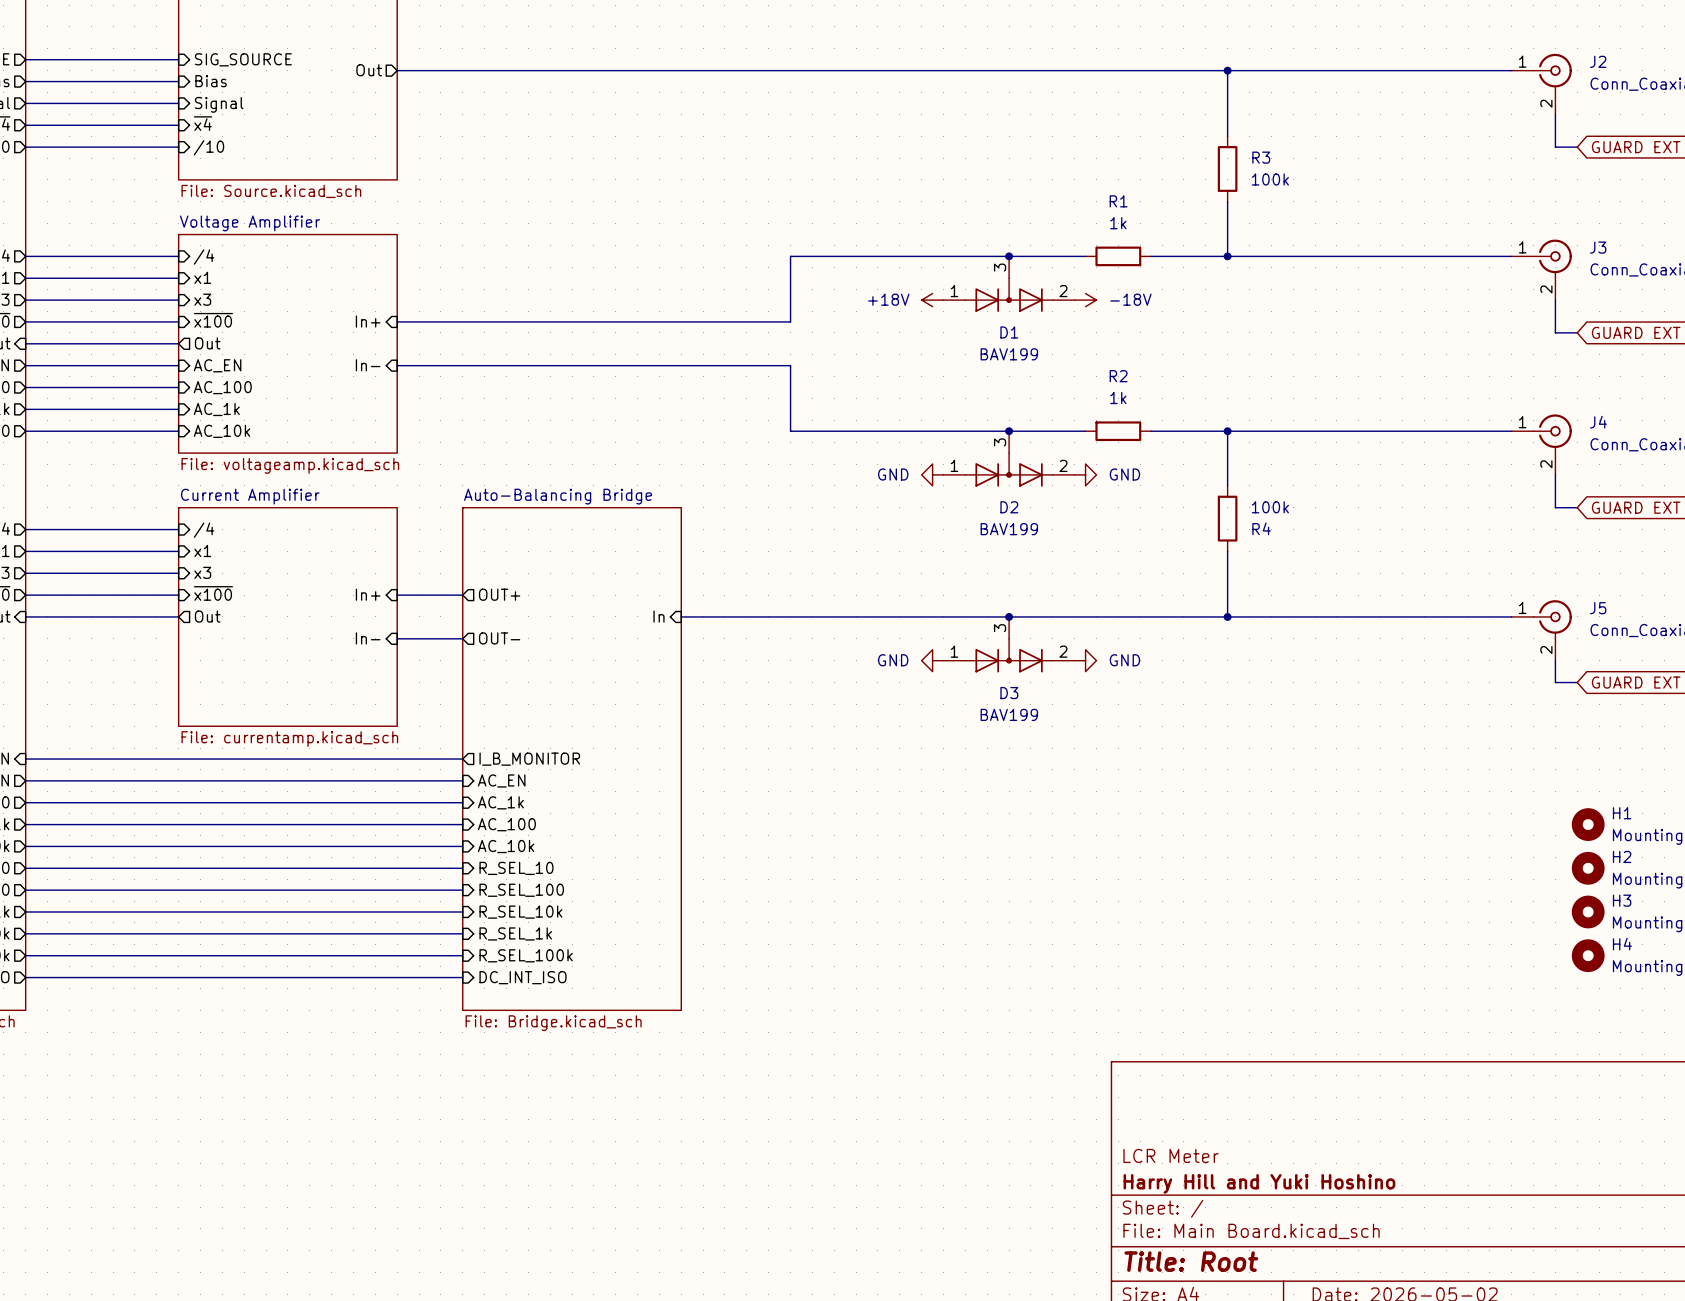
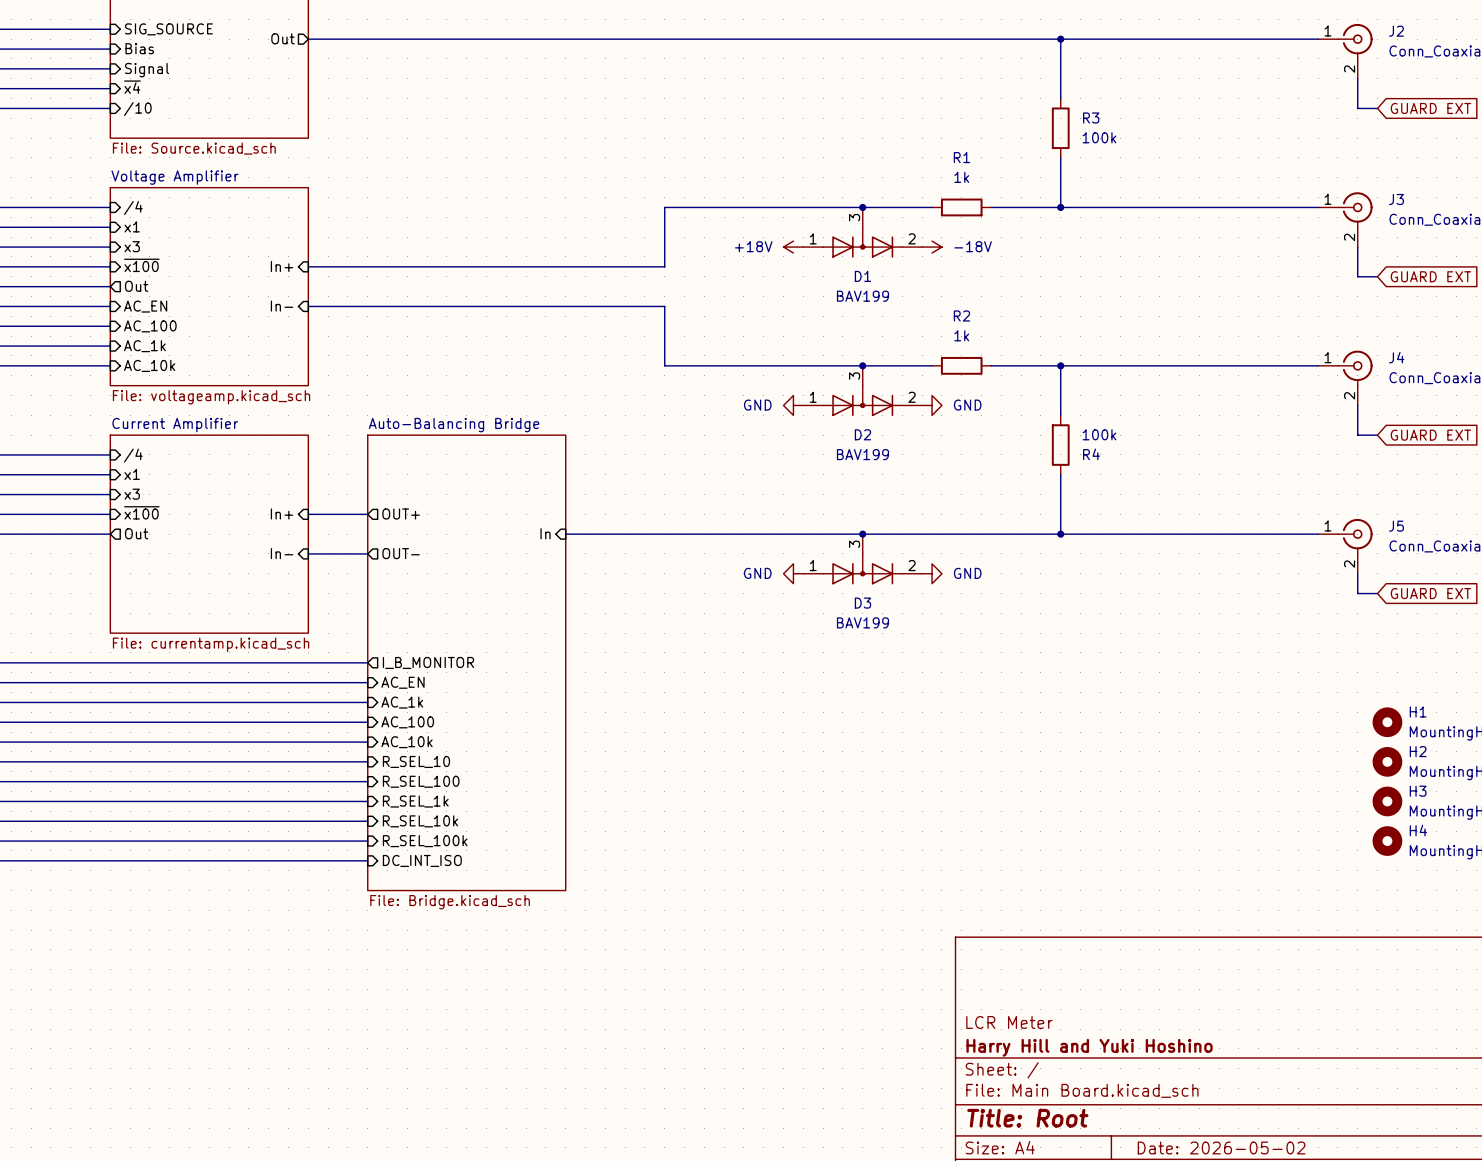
sheet pin: R_SEL_10k (520, 912) -> R_SEL_1k (415, 801)
sheet pin: R_SEL_1k (515, 933) -> R_SEL_10k (420, 821)

